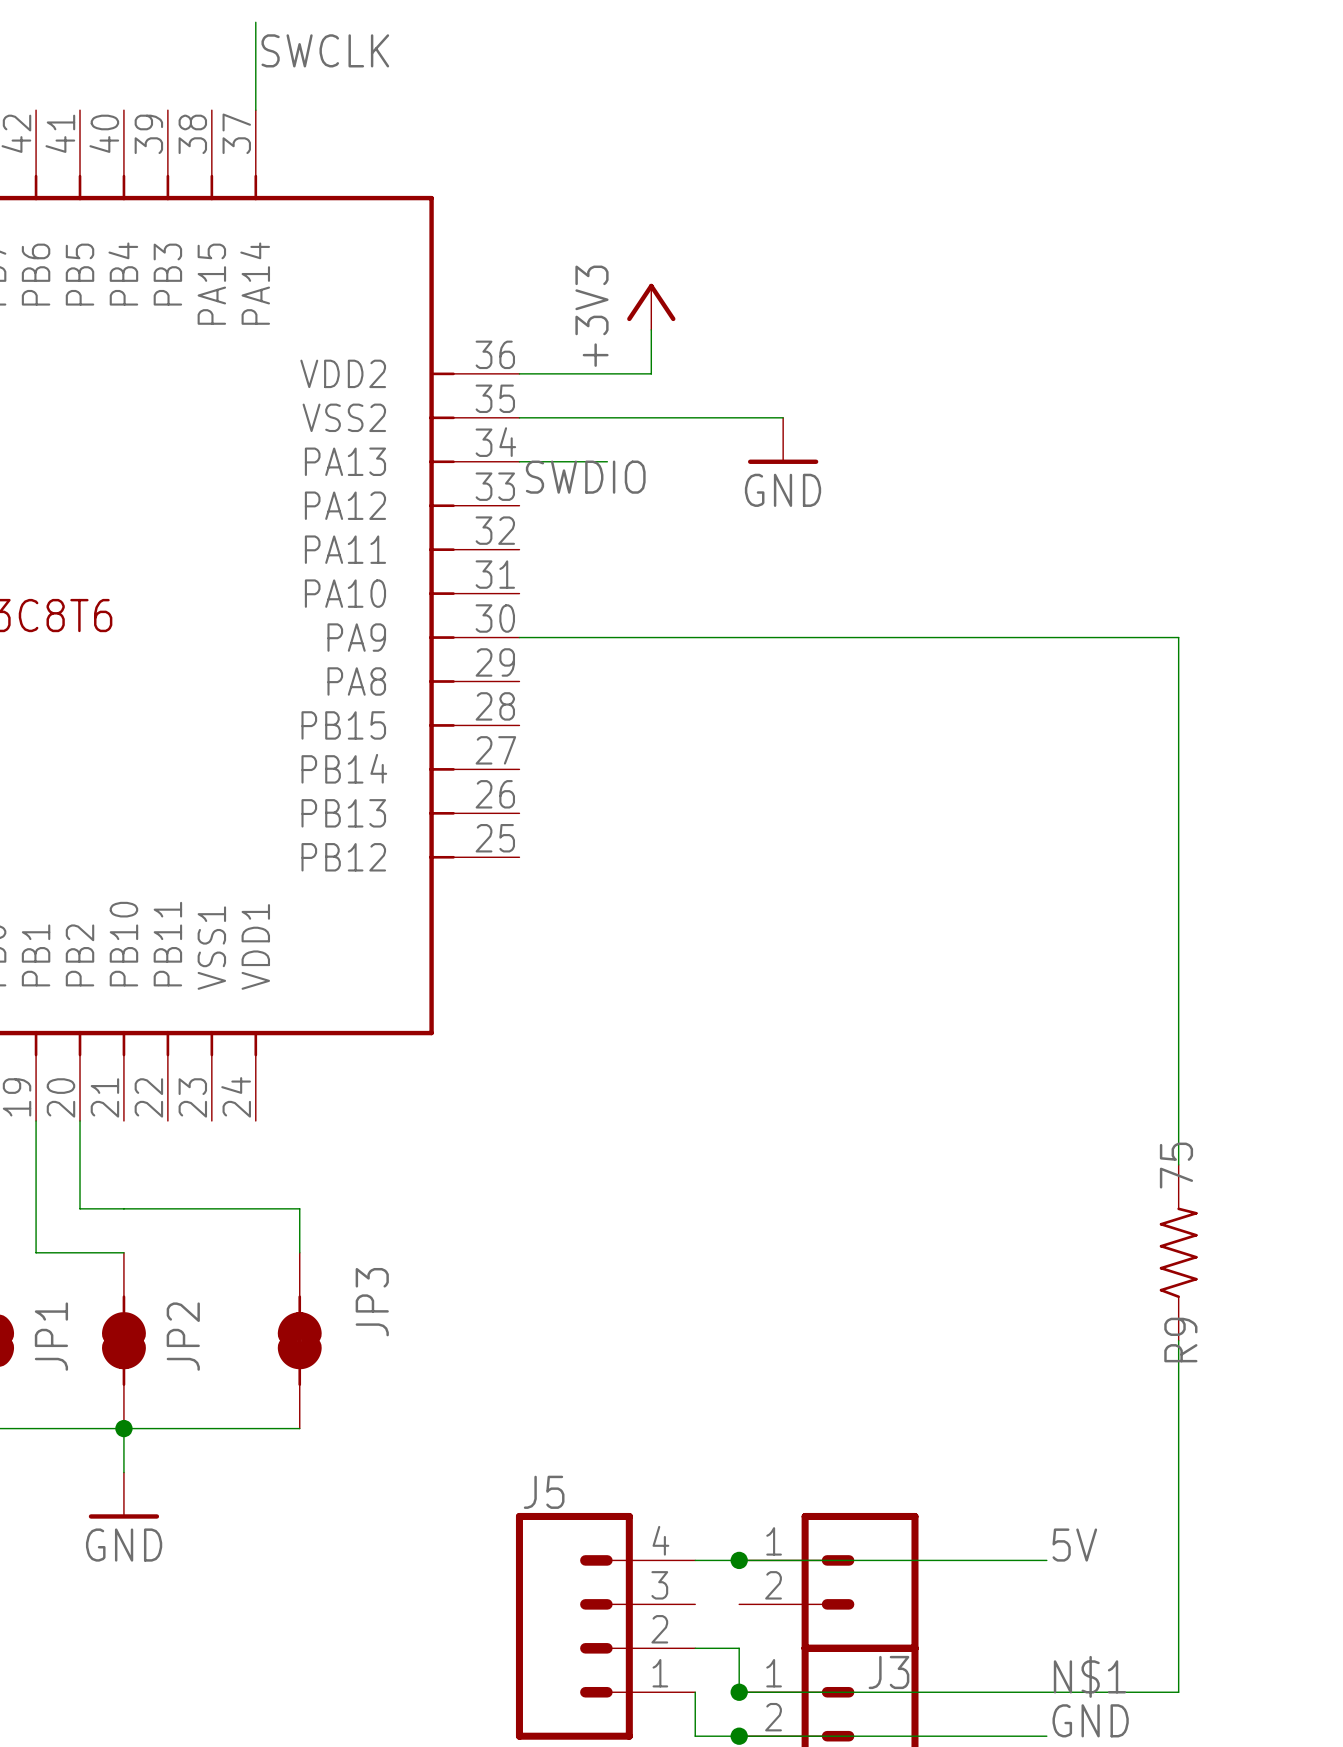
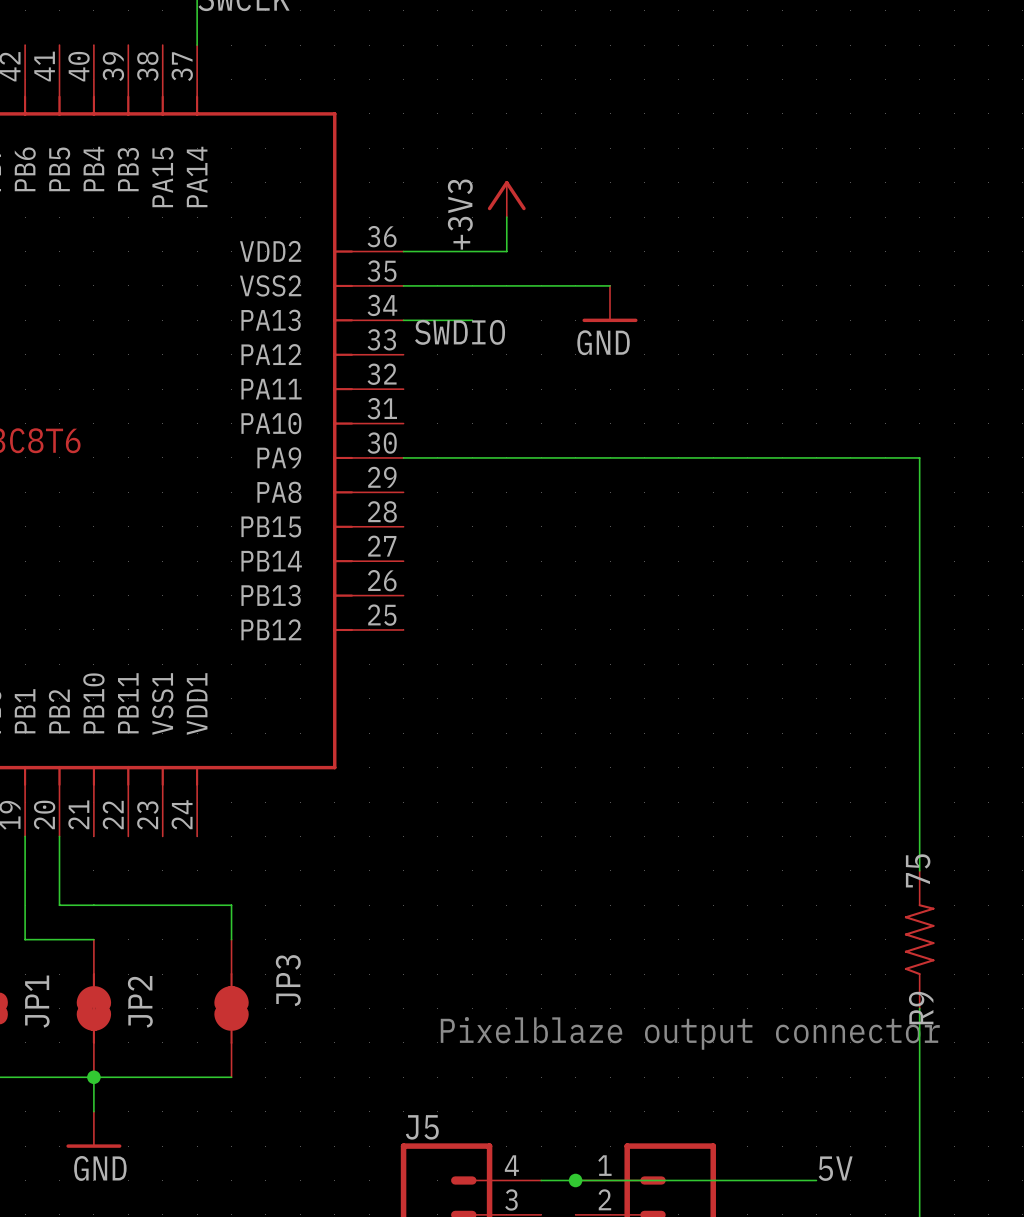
text: none -> Pixelblaze output connector (690, 1033)

